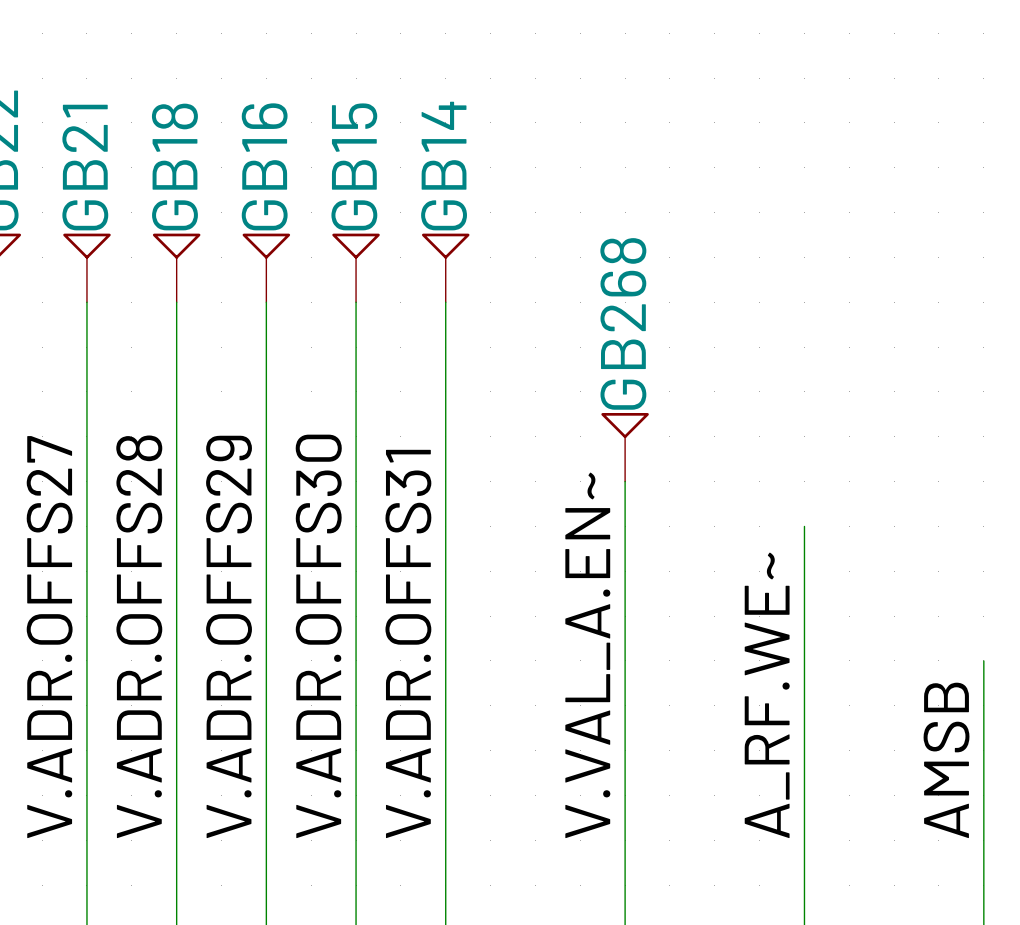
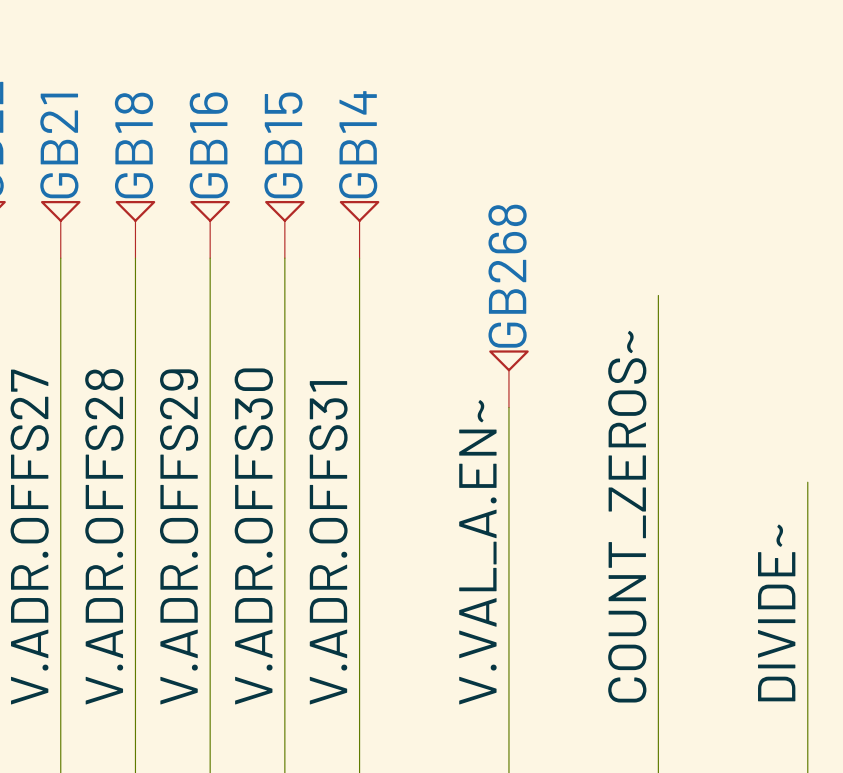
wire: none -> (658, 295) (658, 444)
wire: none -> (807, 482) (807, 556)
label: A_RF.WE~ (767, 695) -> COUNT_ZEROS~ (627, 516)
label: AMSB (946, 760) -> DIVIDE~ (776, 612)

